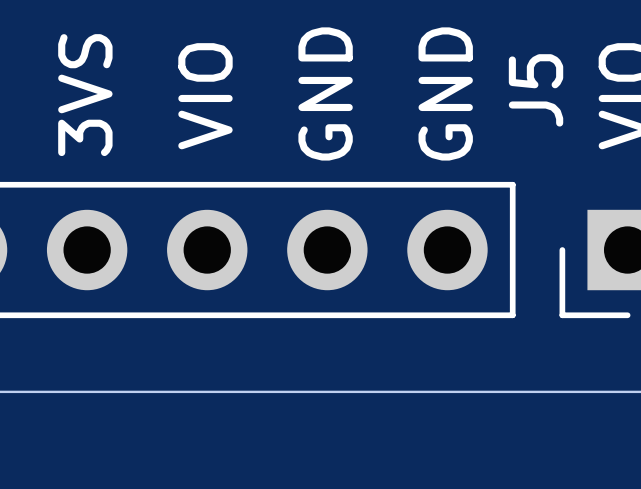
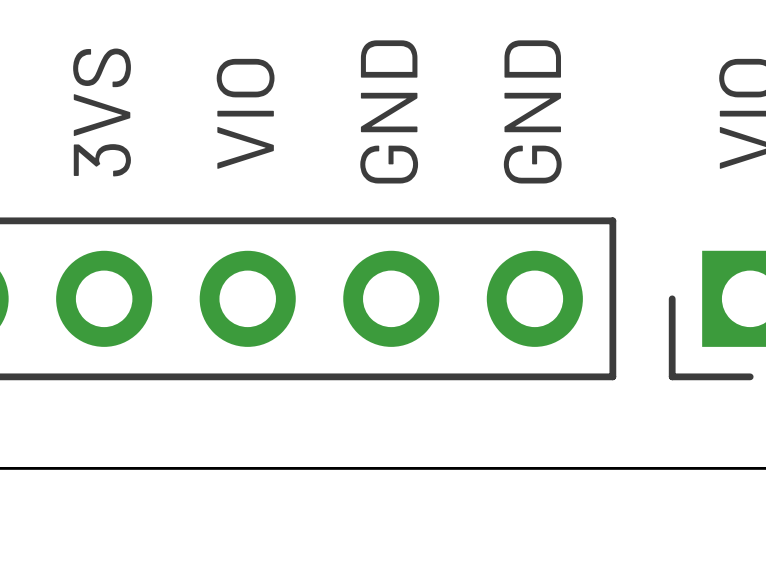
J5 name: J5 (536, 90) -> none

